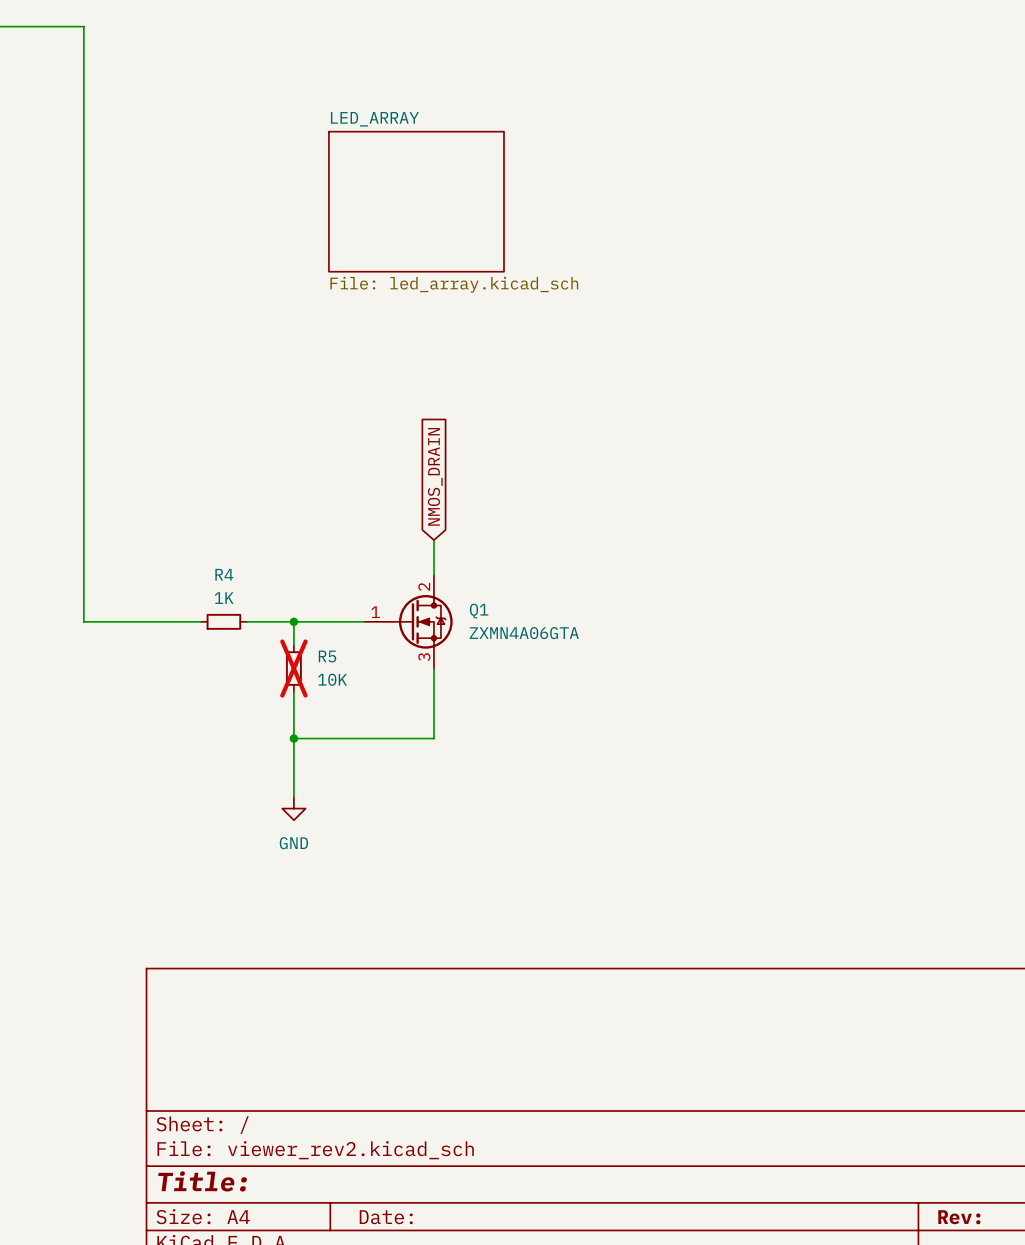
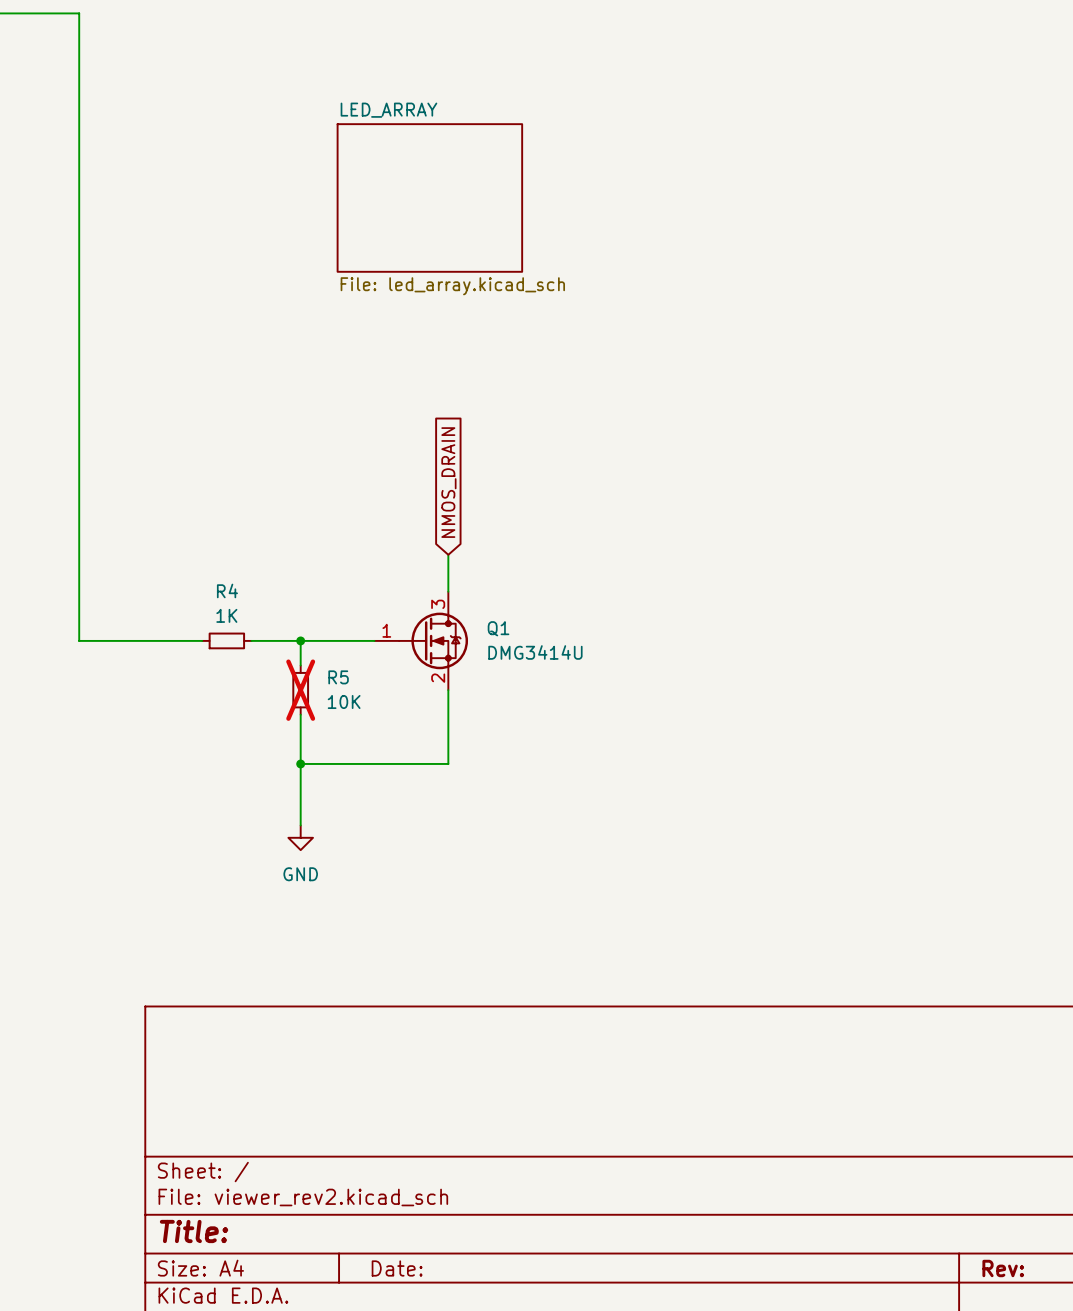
Q1 pin number: 2 (424, 586) -> 3 (438, 604)
Q1 value: ZXMN4A06GTA (524, 633) -> DMG3414U (535, 652)
Q1 pin number: 3 (424, 657) -> 2 (438, 678)

